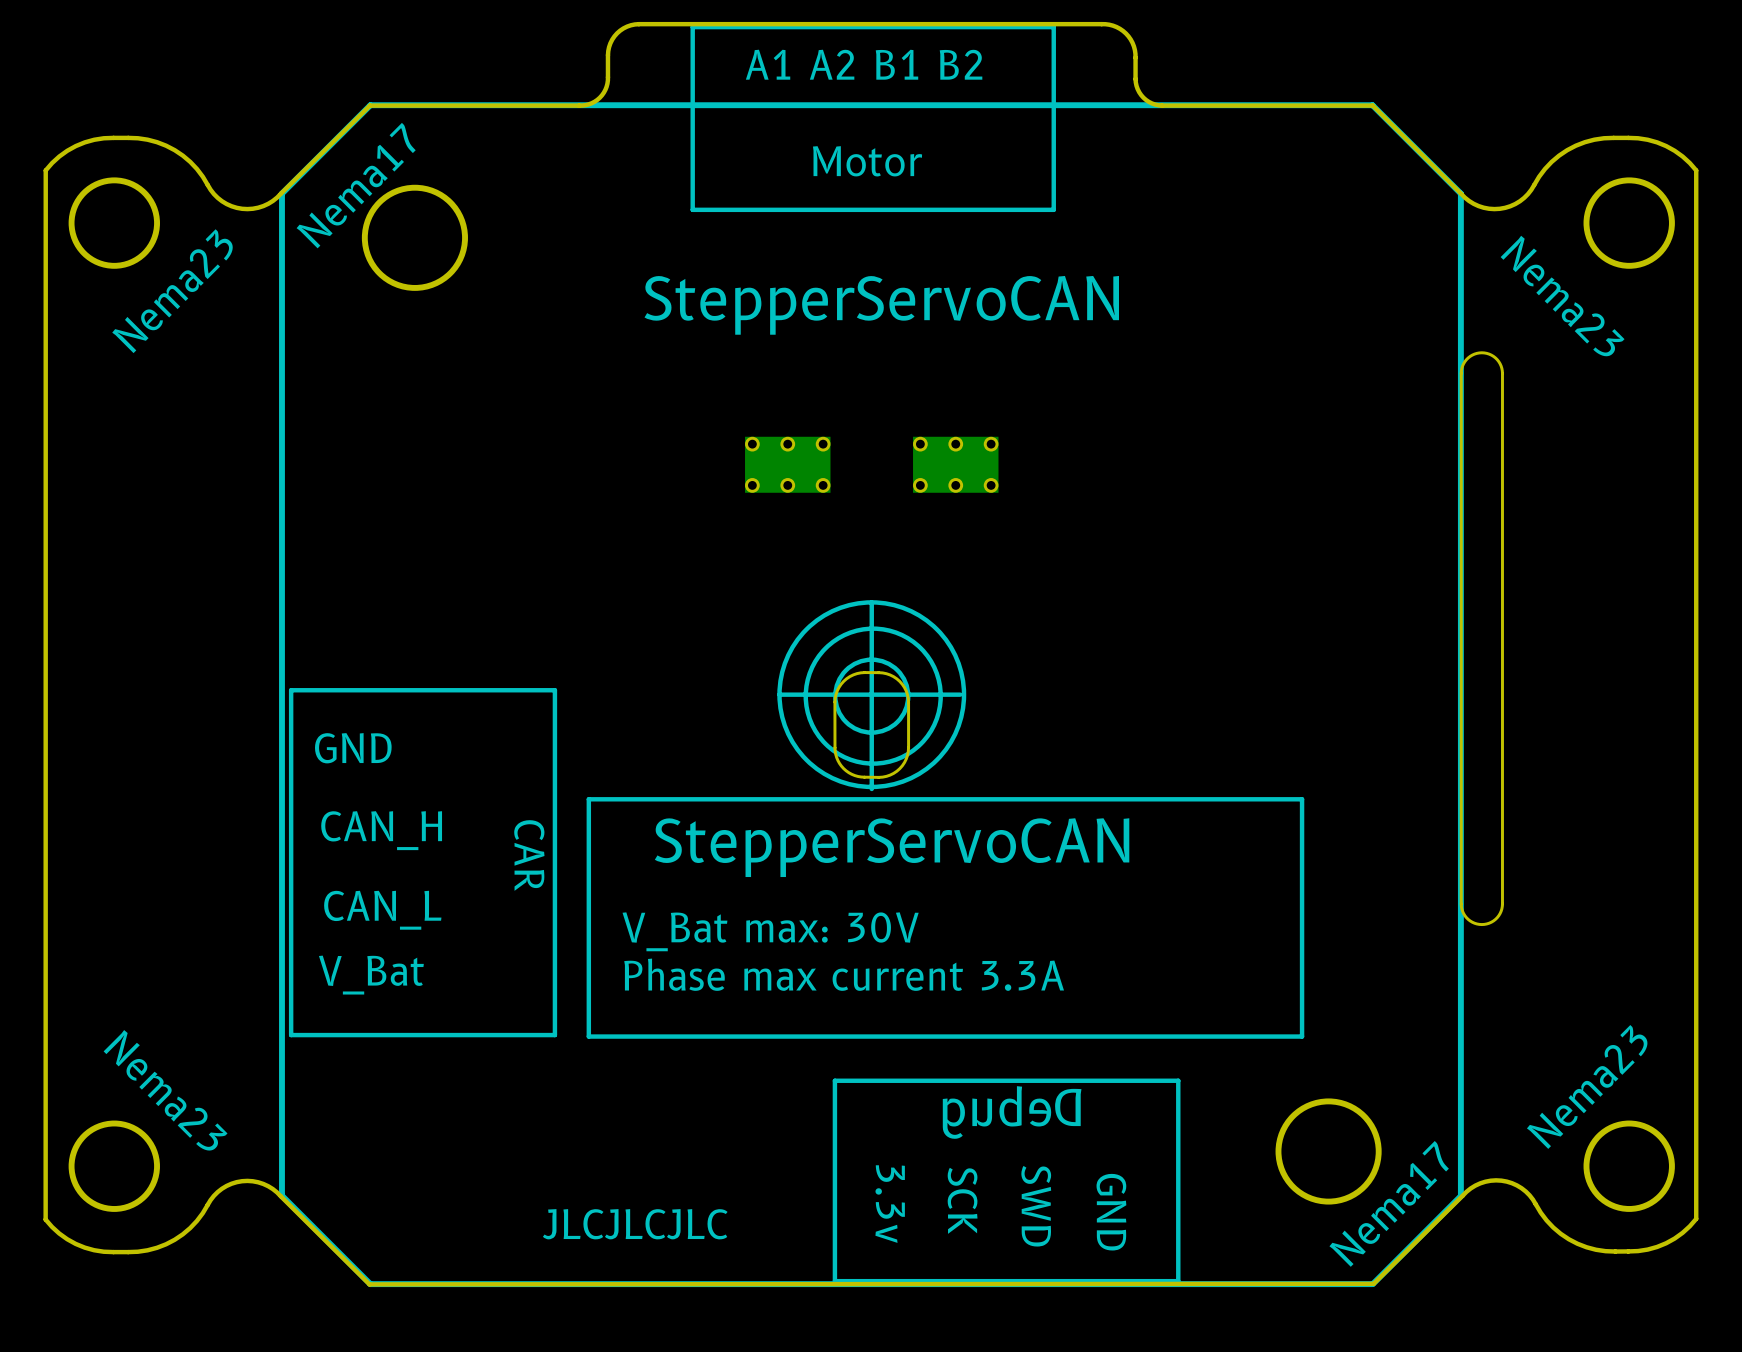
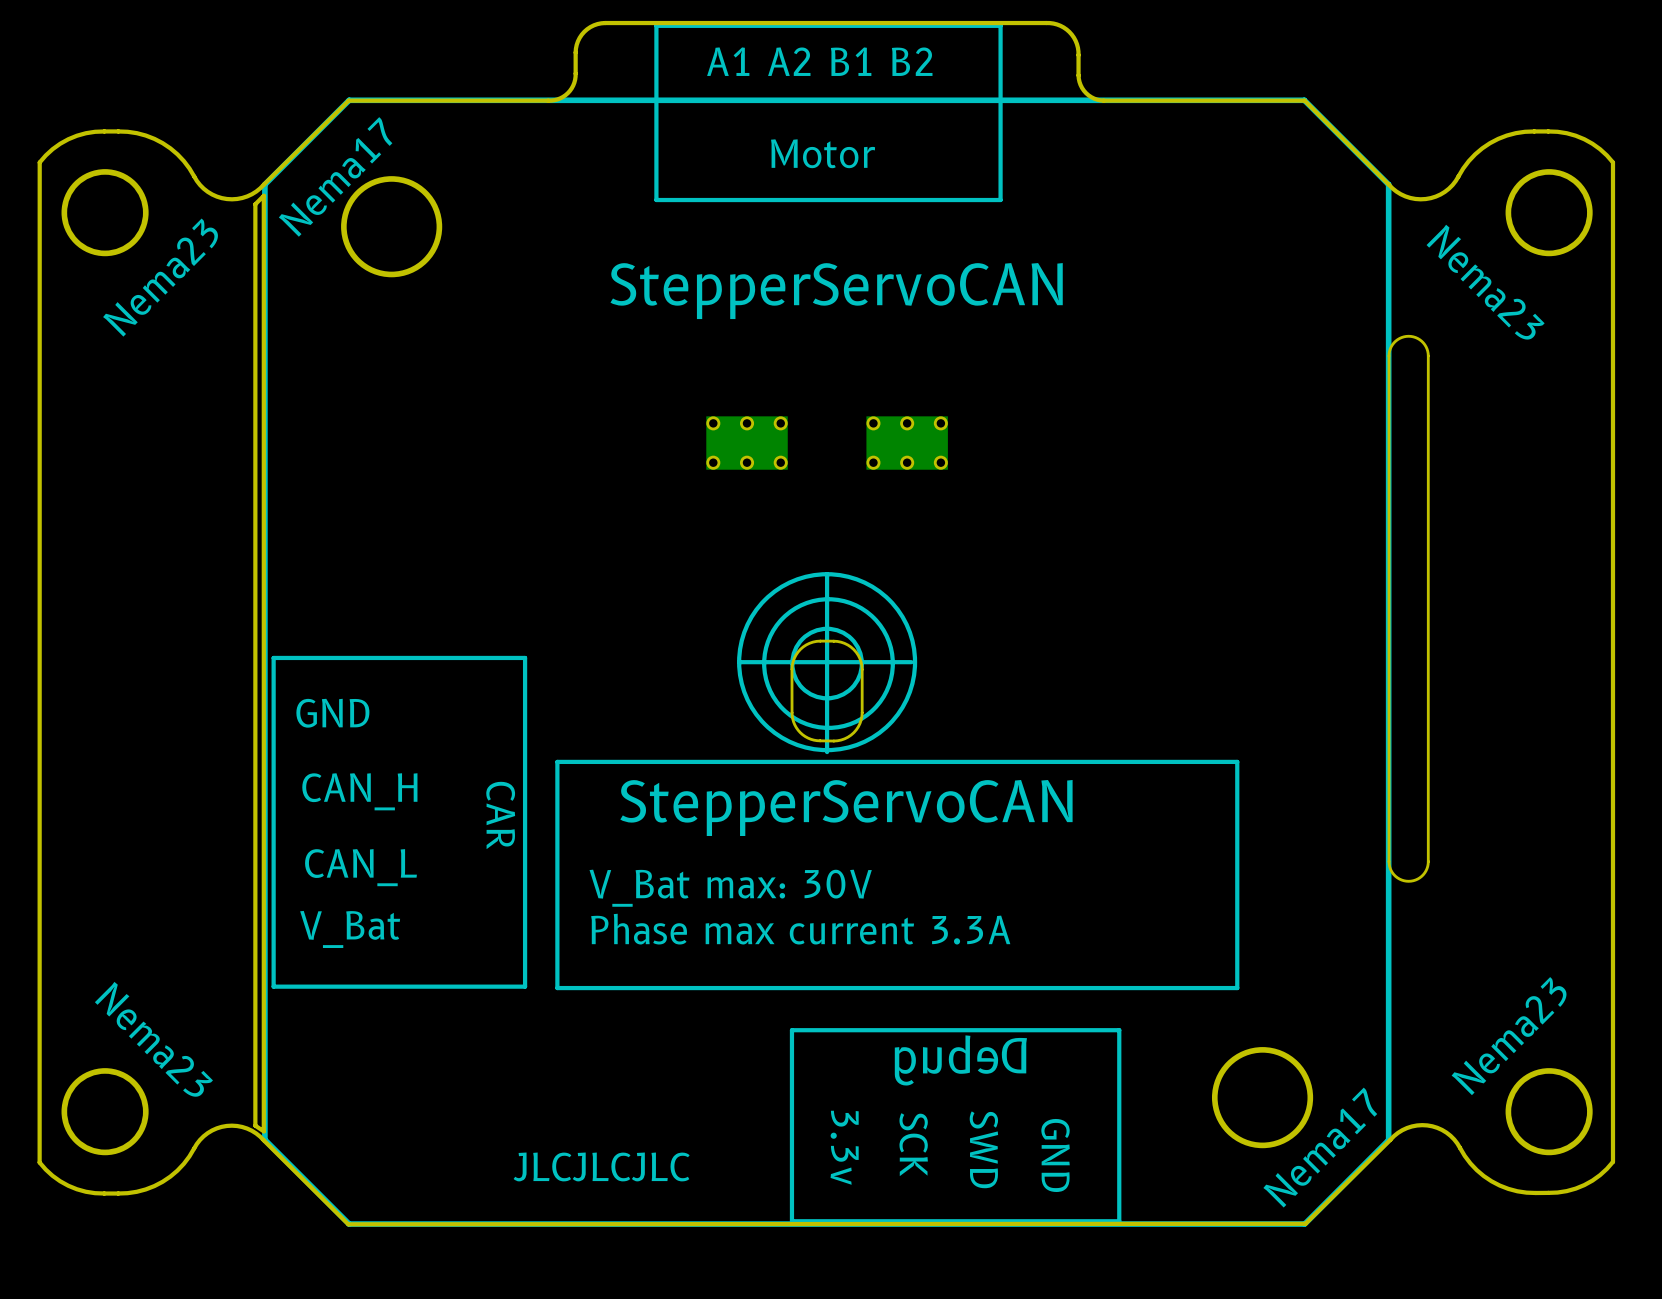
board edge: none -> (263, 195) (255, 204) (255, 1125) (263, 1131) (263, 195)

